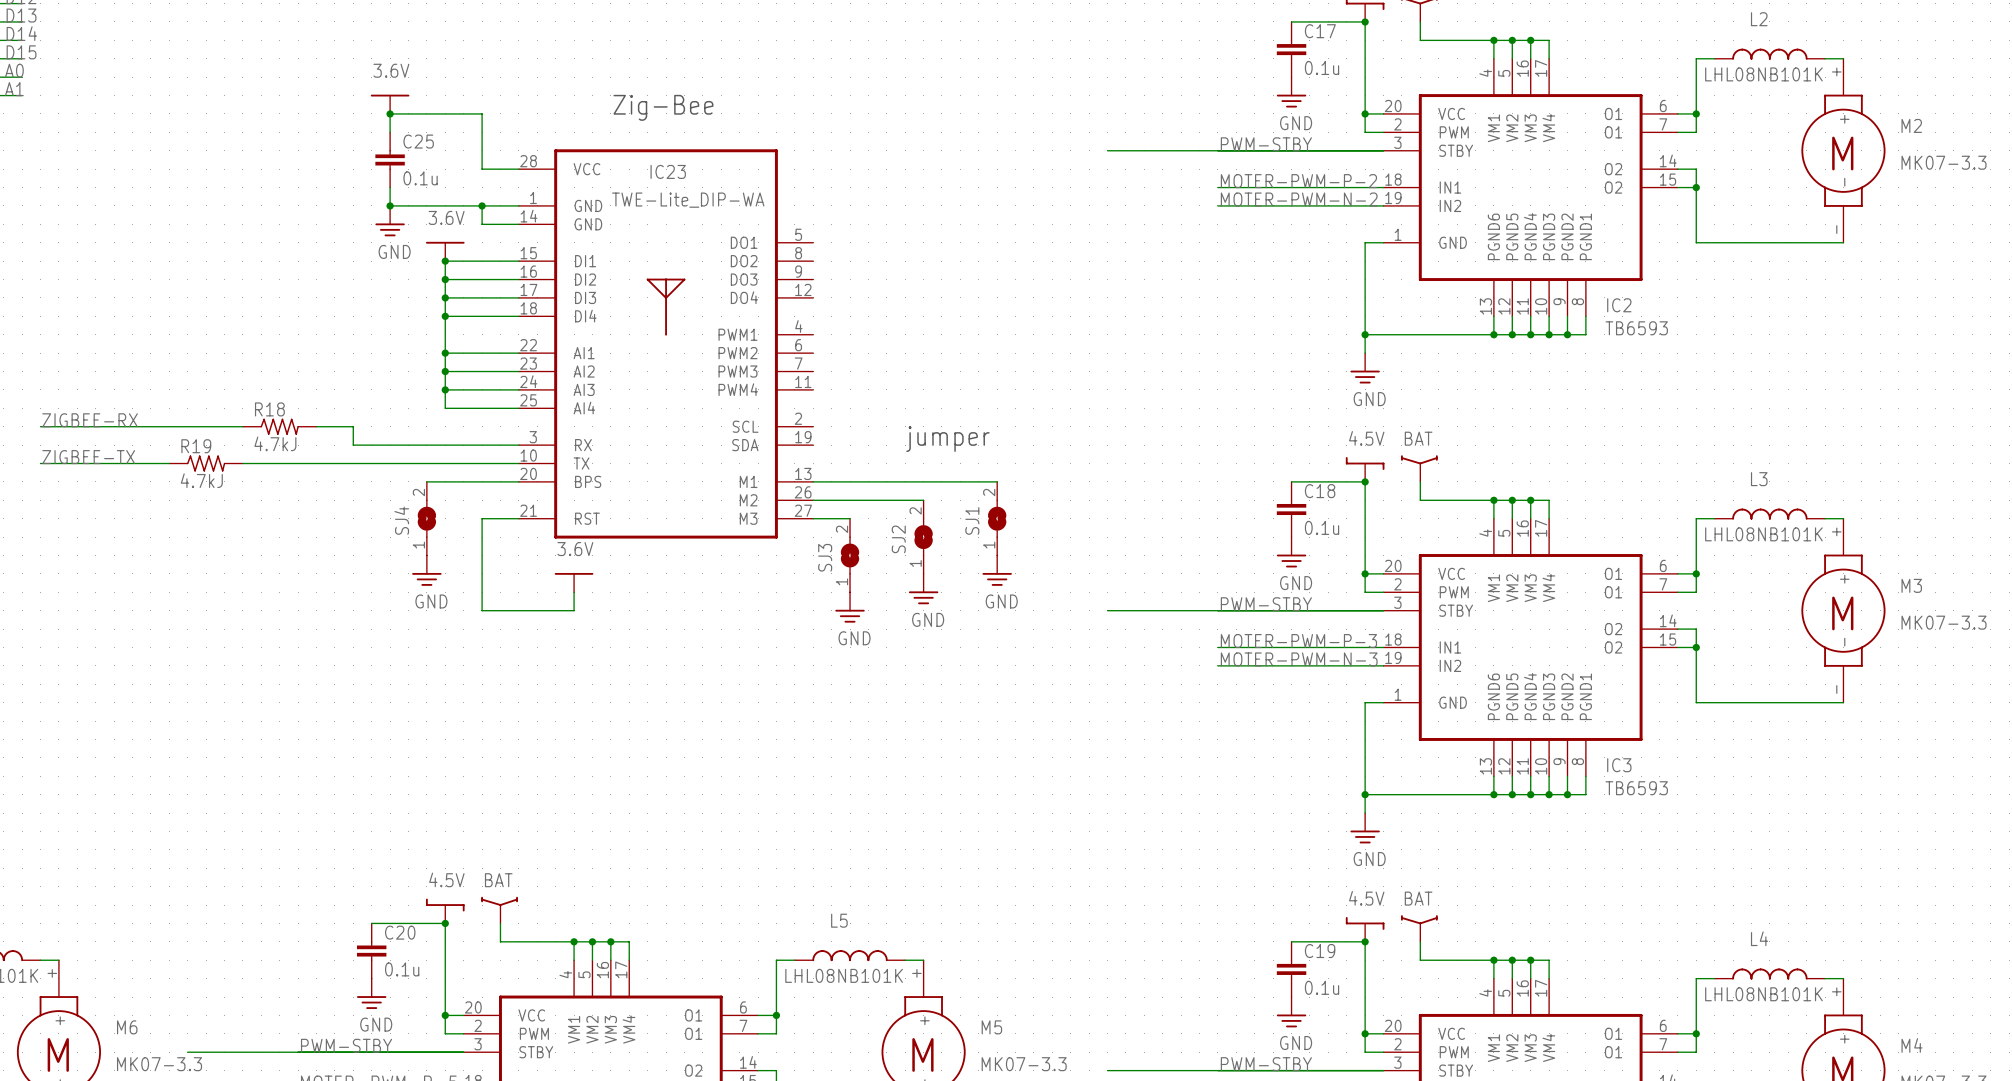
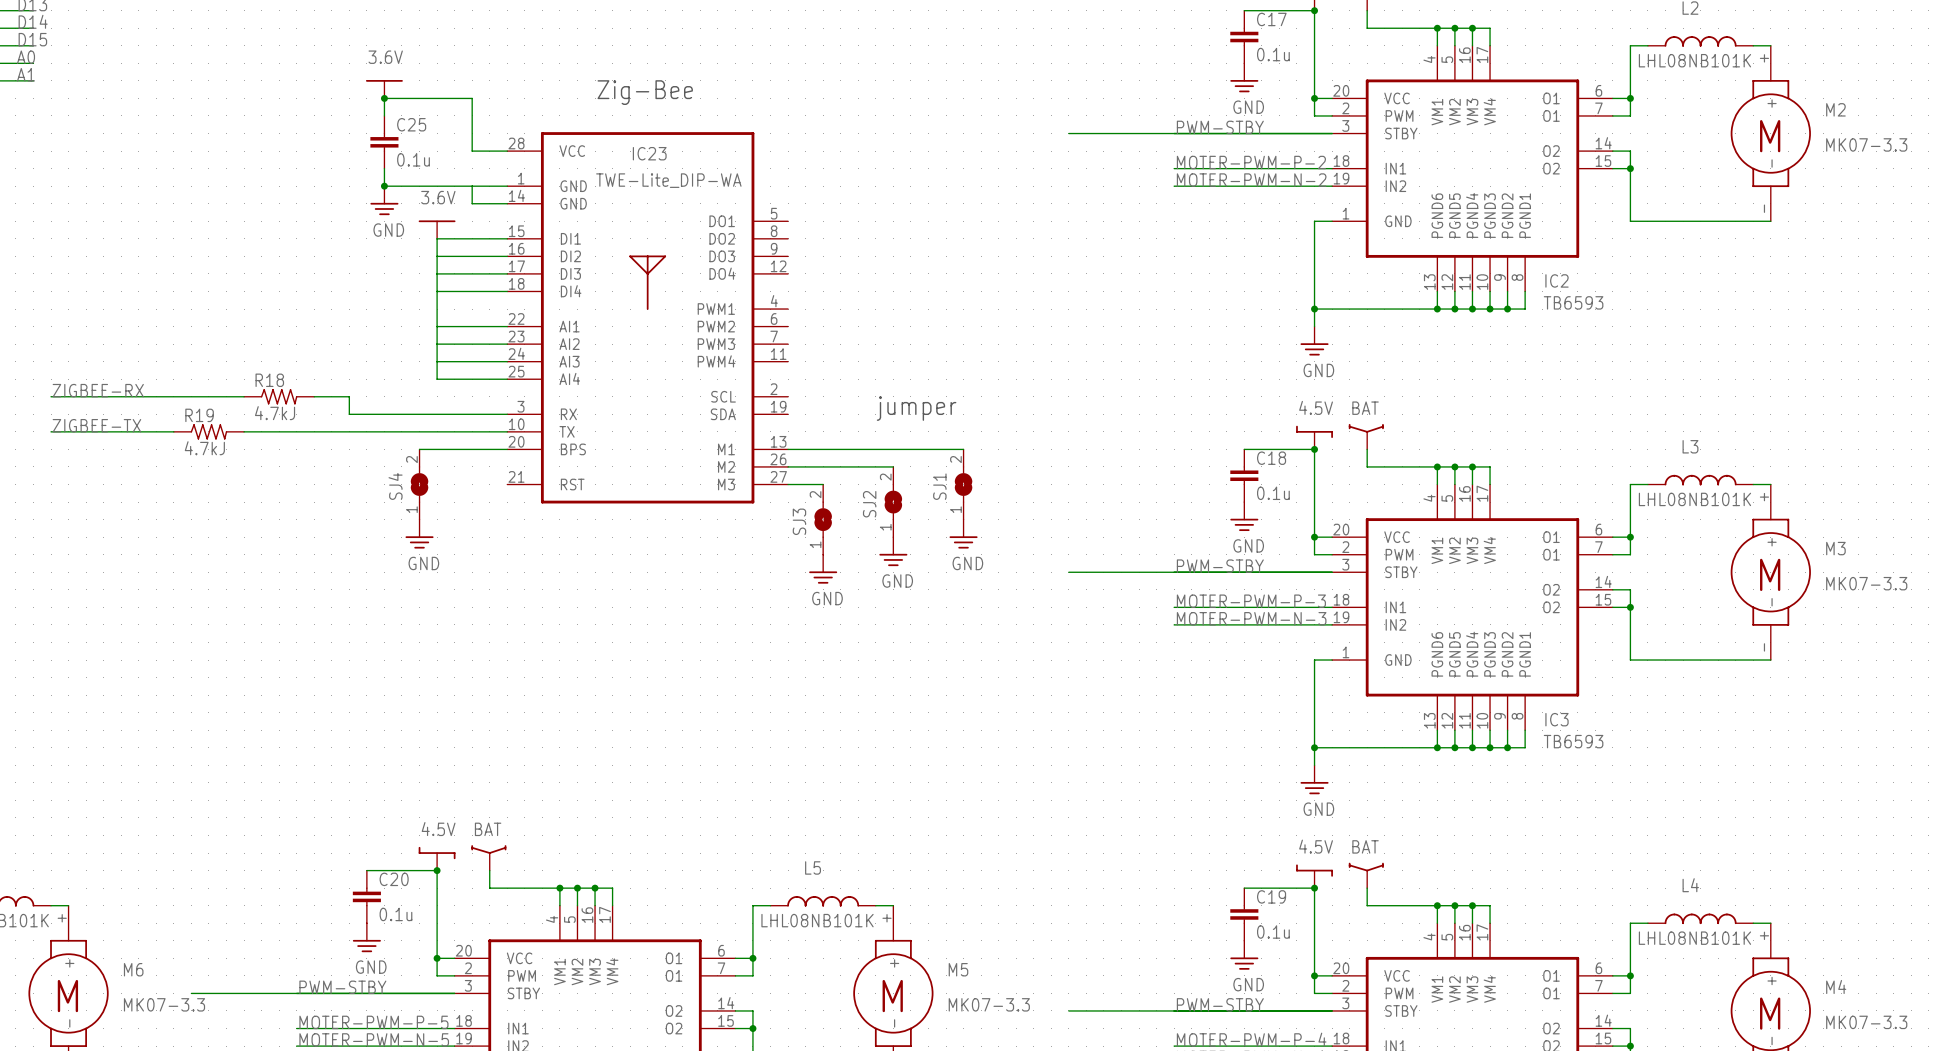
junction: (482, 205) -> none
junction: (445, 261) -> none
junction: (445, 279) -> none
junction: (445, 297) -> none
junction: (445, 316) -> none
junction: (445, 353) -> none
junction: (445, 371) -> none
junction: (445, 389) -> none
wire: (518, 518) (482, 518) (482, 610) (574, 610) (574, 592) -> none
power symbol: (574, 582) -> none

